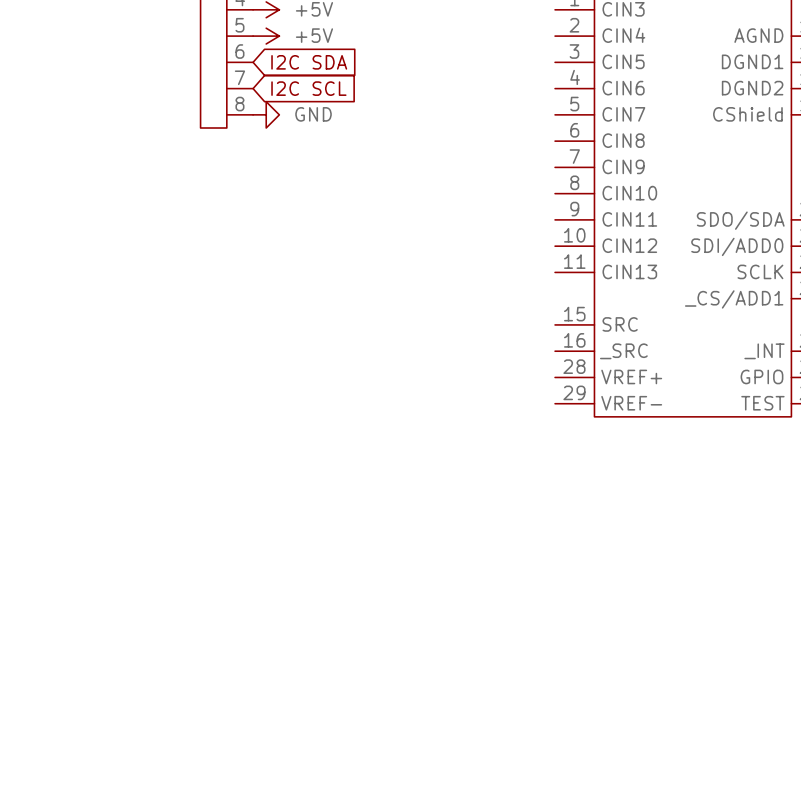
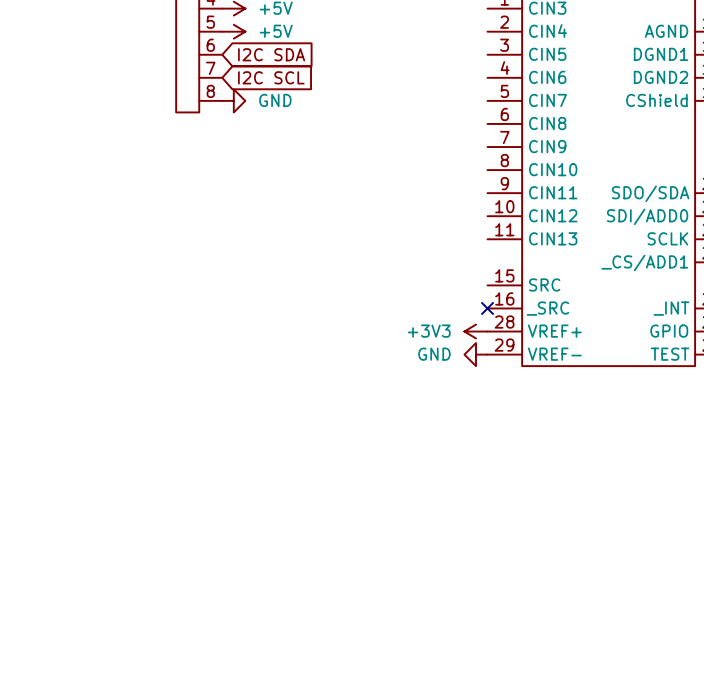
no-connect mark: none -> (487, 308)
power symbol: none -> +3V3 (475, 331)
power symbol: none -> GND (475, 354)

